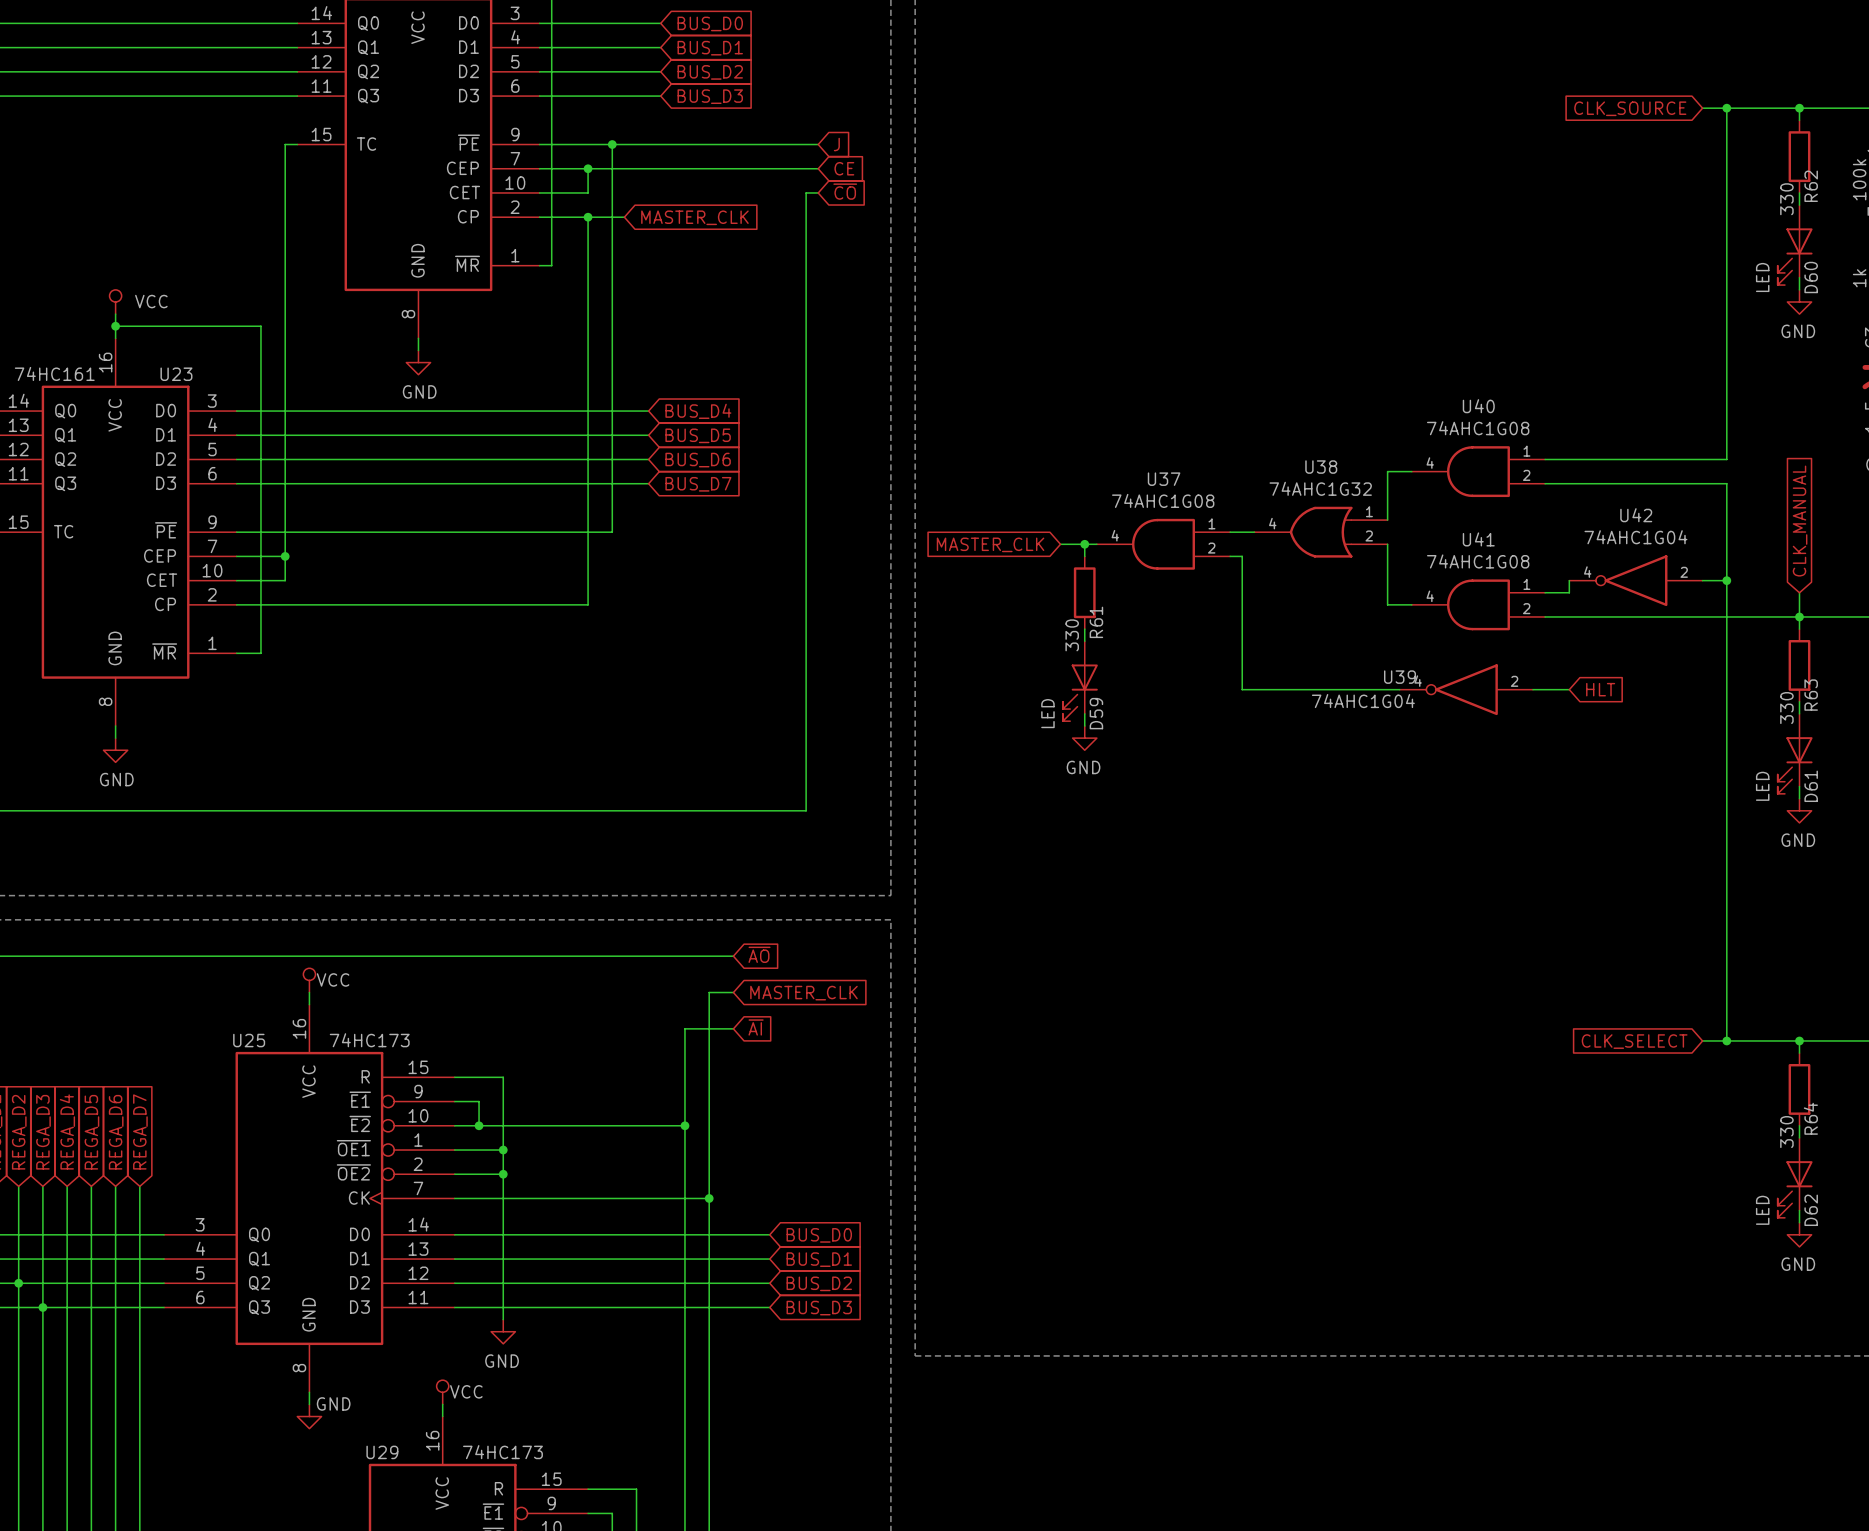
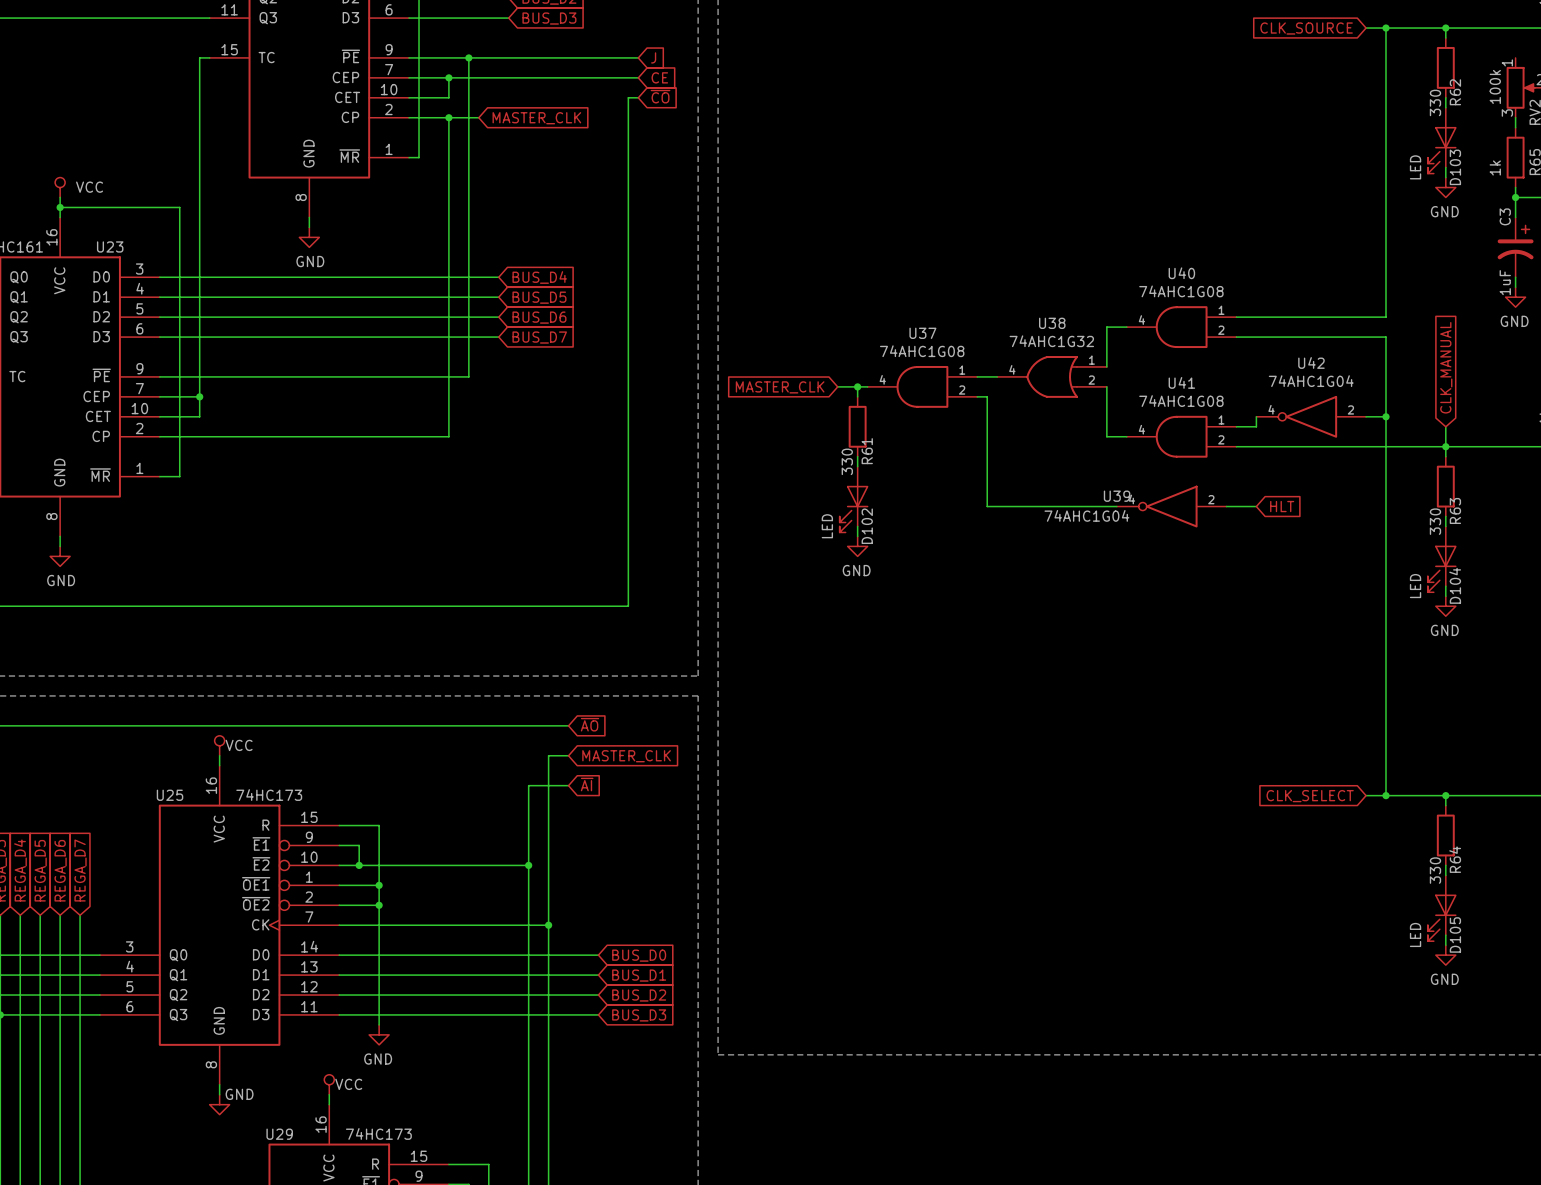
D60 name: D60 (1811, 277) -> D103 (1455, 167)
D59 name: D59 (1096, 713) -> D102 (867, 526)
D61 name: D61 (1811, 786) -> D104 (1455, 585)
D62 name: D62 (1811, 1210) -> D105 (1455, 934)

